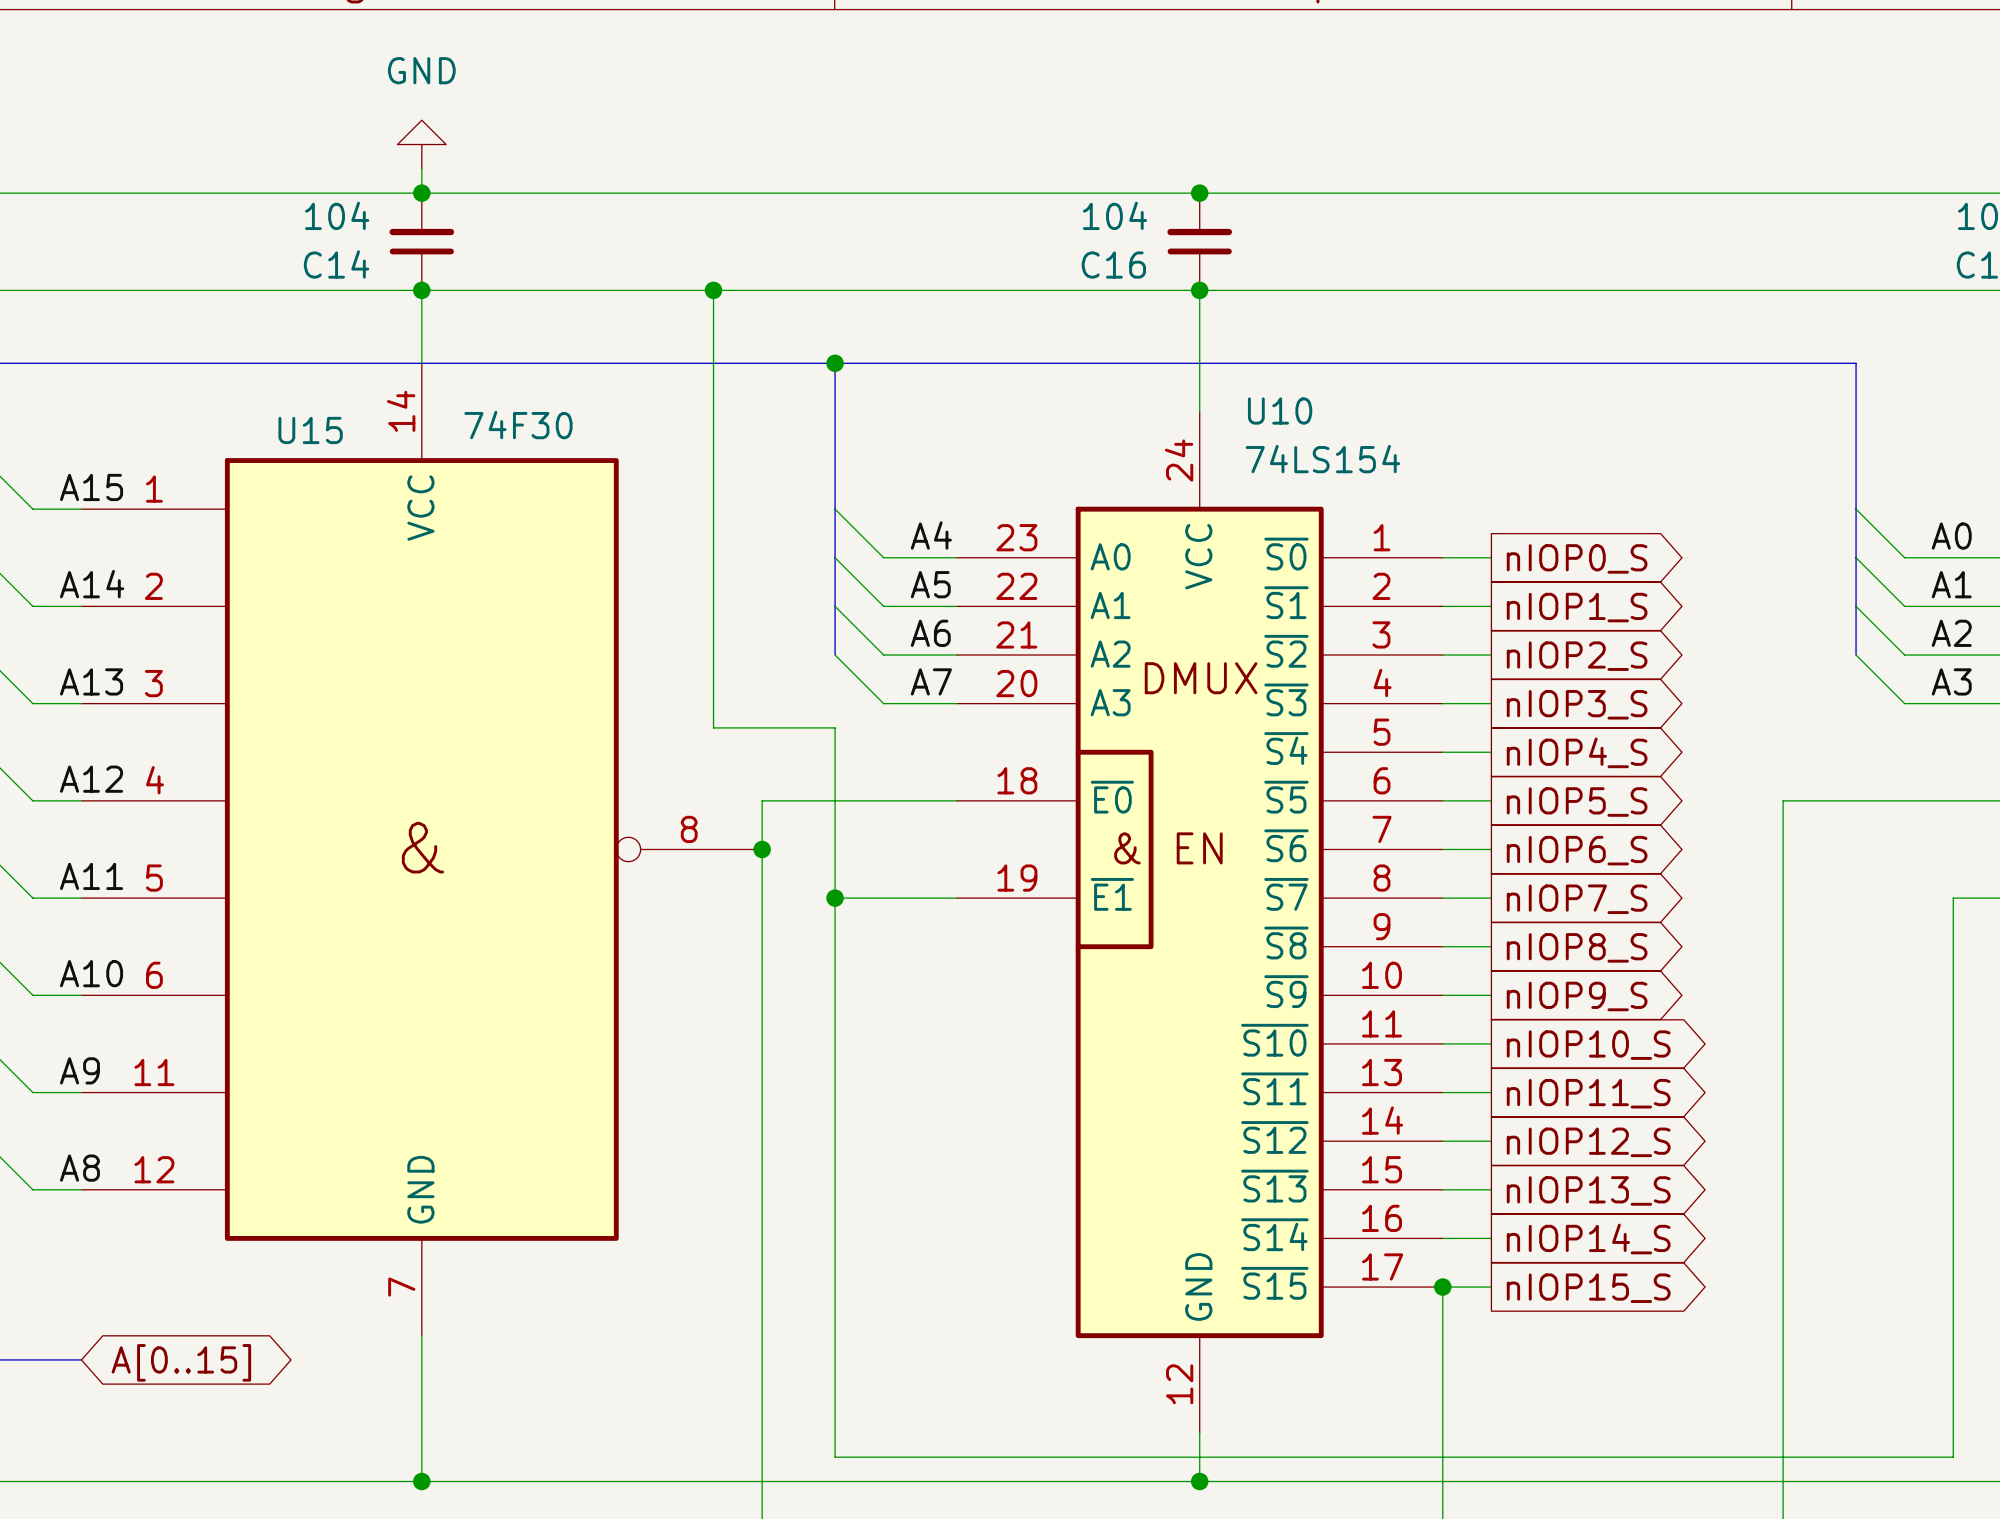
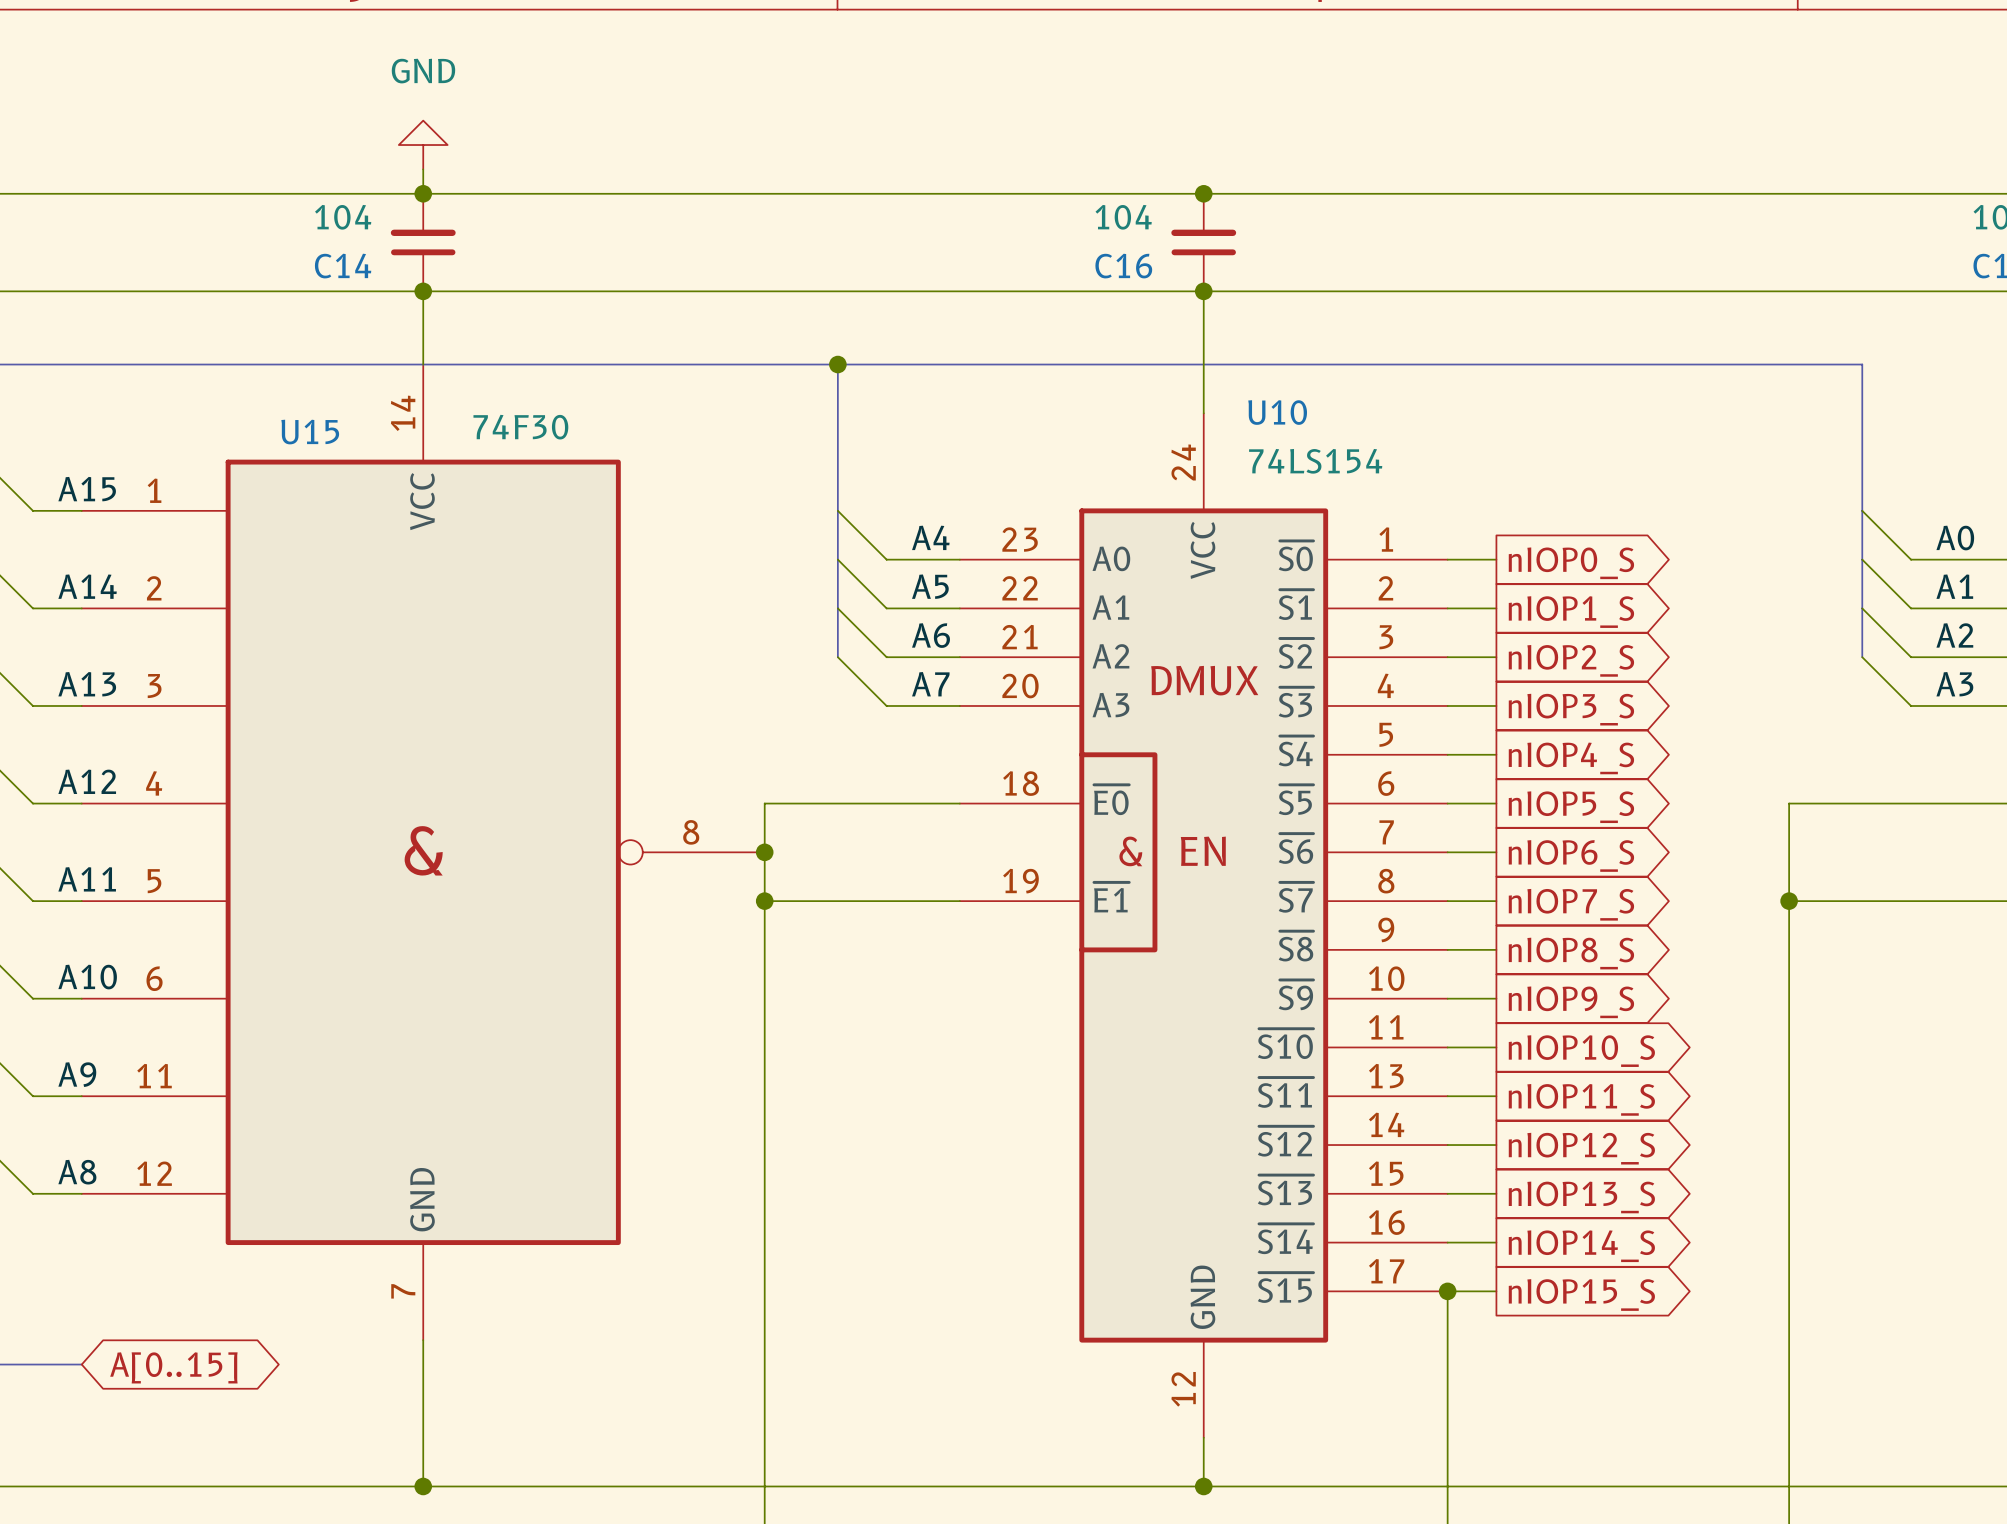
wire: (713, 290) (713, 727) (835, 727) (835, 1457) (1953, 1457) (1953, 898) -> (1789, 901) (1959, 901)
junction: (713, 290) -> none
wire: none -> (764, 901) (837, 901)
junction position: (835, 898) -> (764, 901)
junction: none -> (1789, 901)

